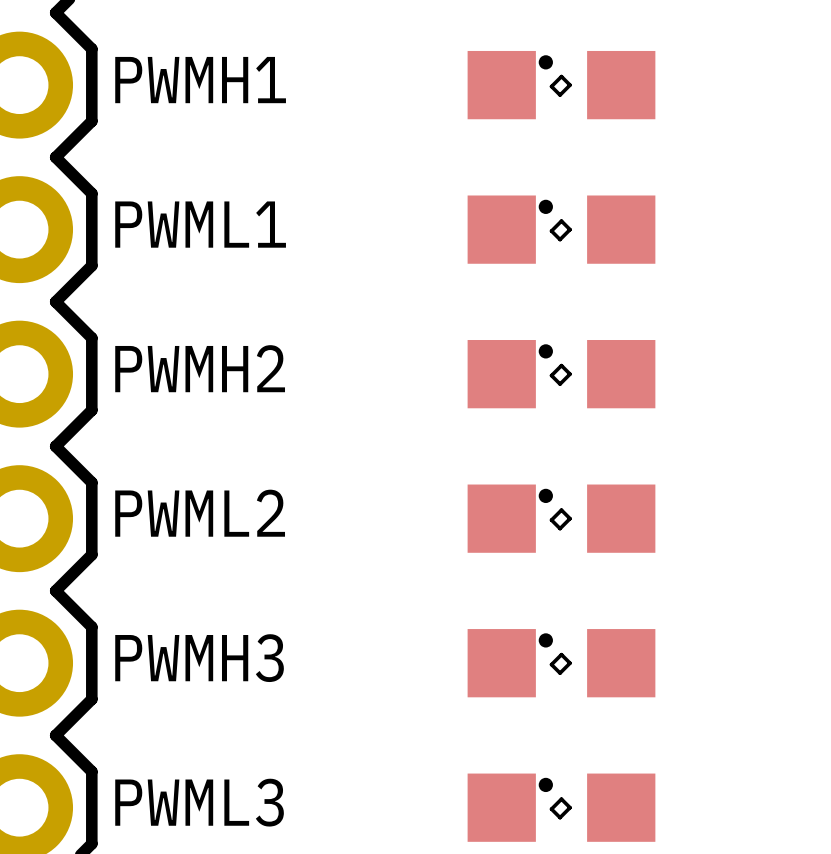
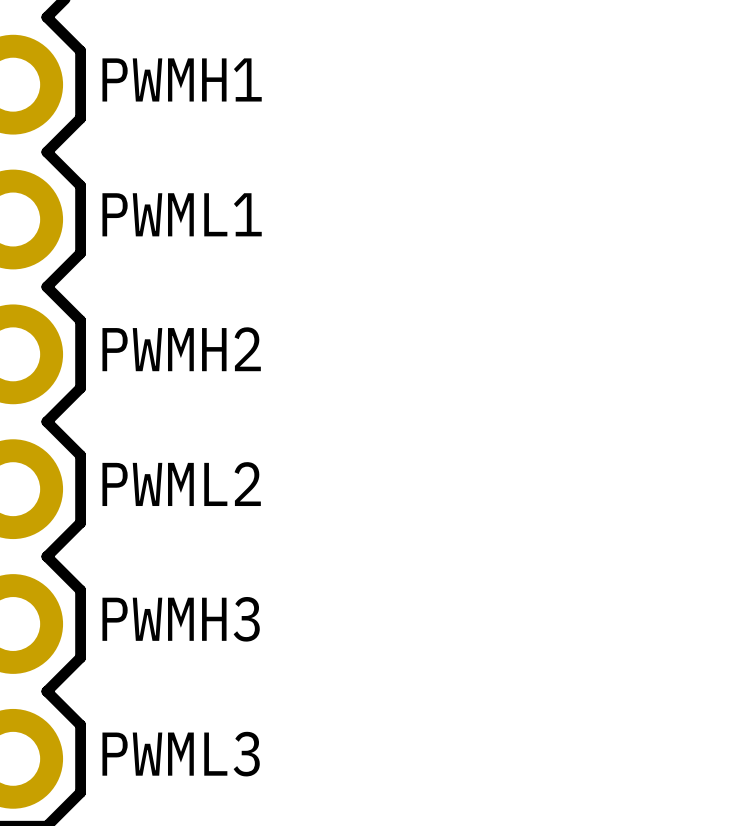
part: (561, 85) -> none
part: (561, 229) -> none
part: (561, 374) -> none
part: (561, 518) -> none
part: (561, 663) -> none
part: (561, 807) -> none

